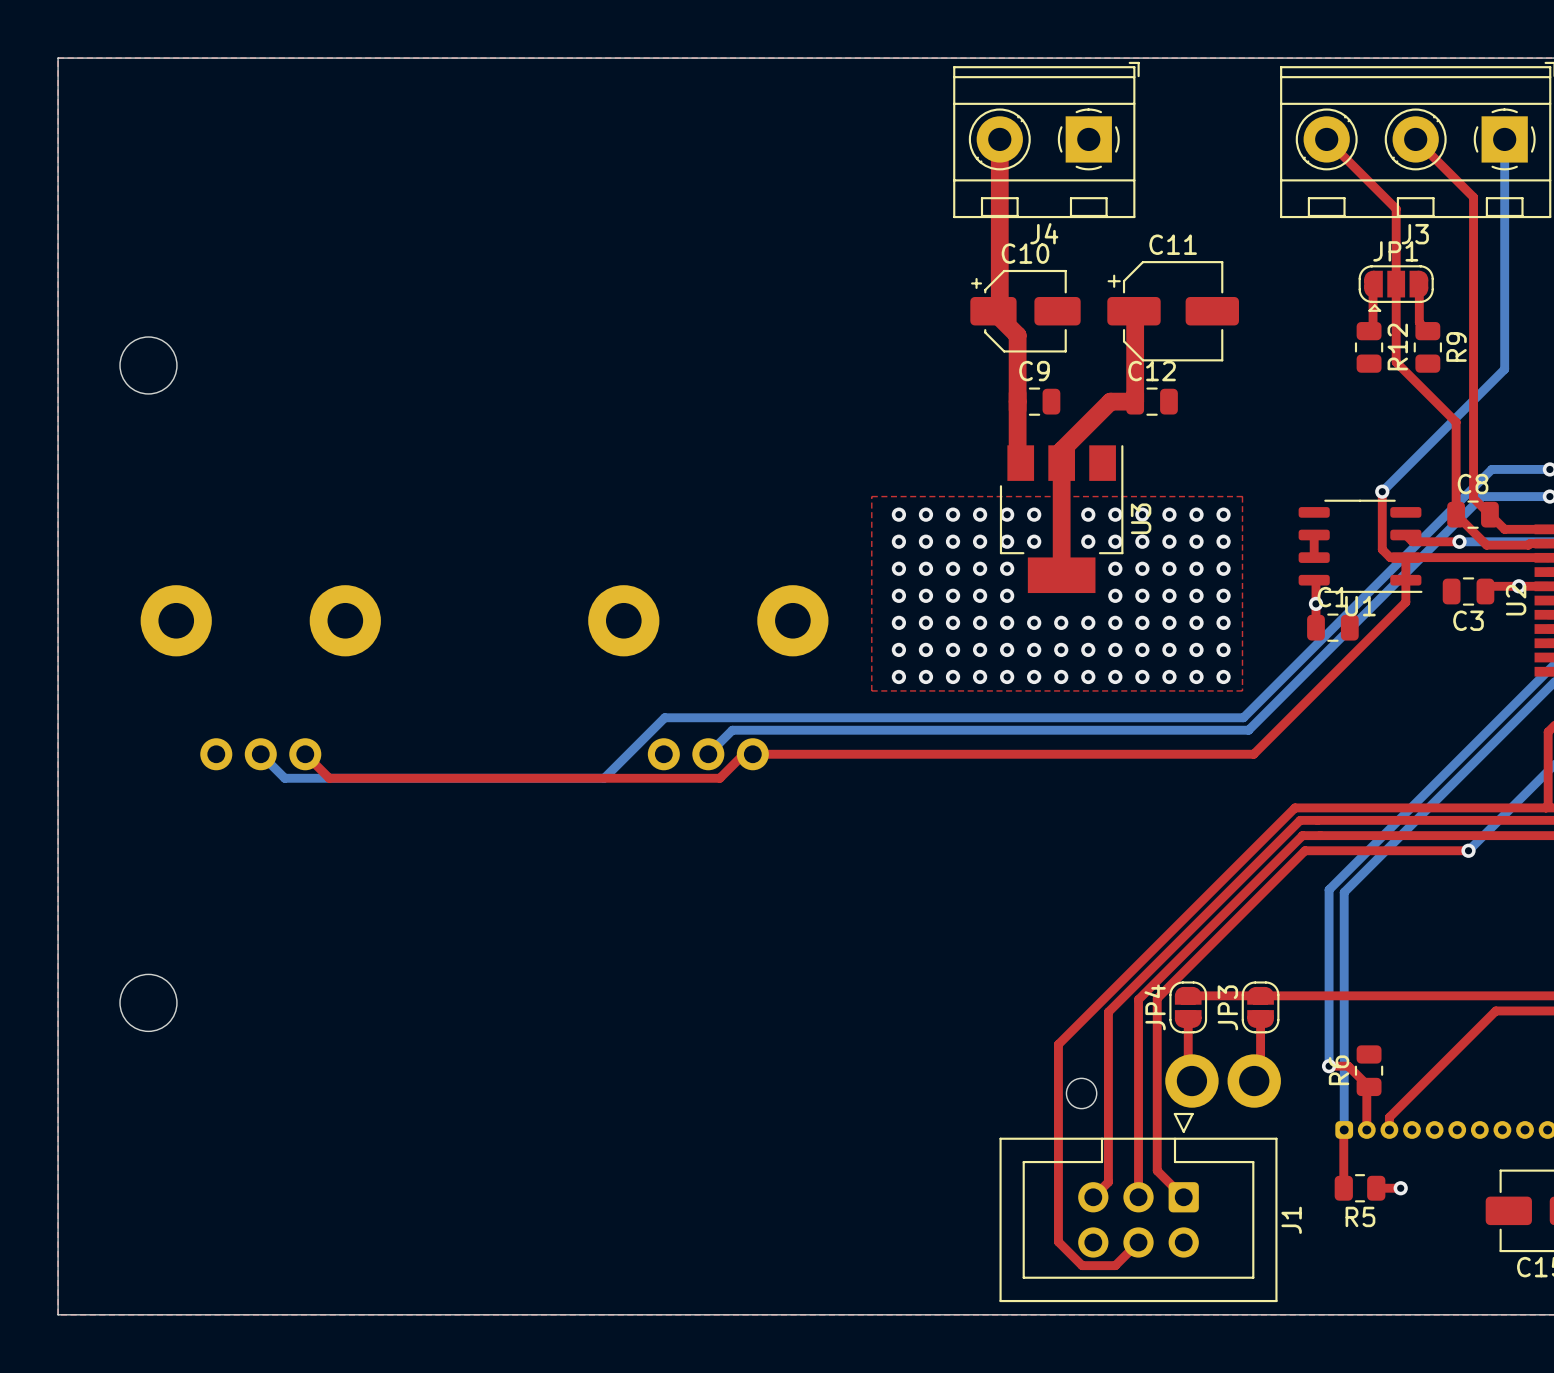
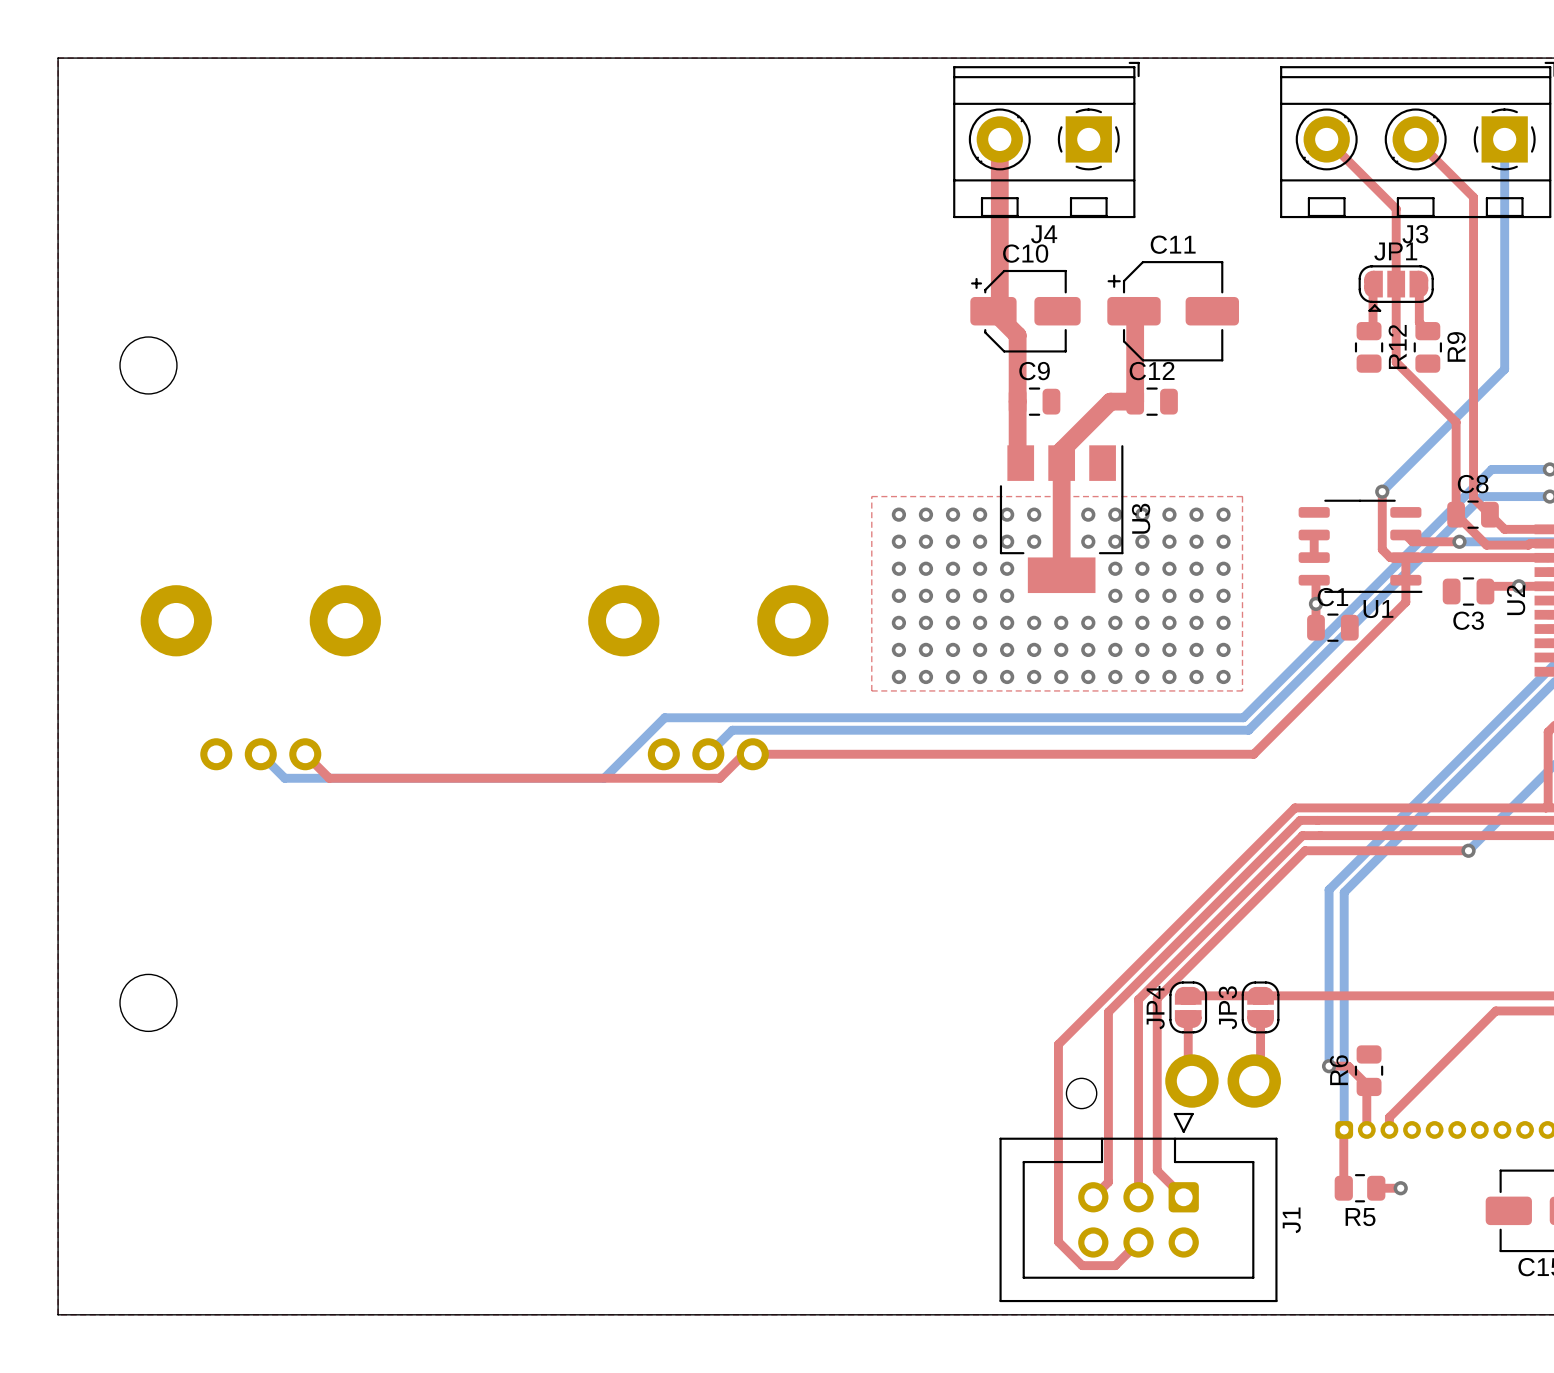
U1 name position: U1 (1360, 606) -> U1 (1378, 609)

